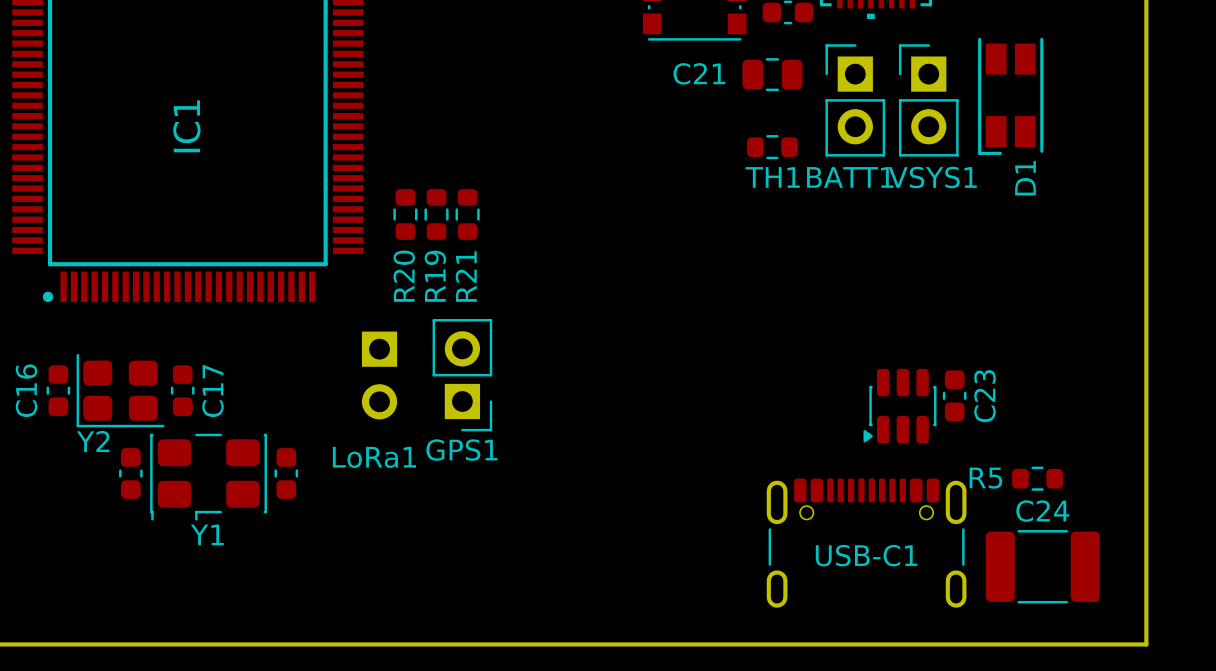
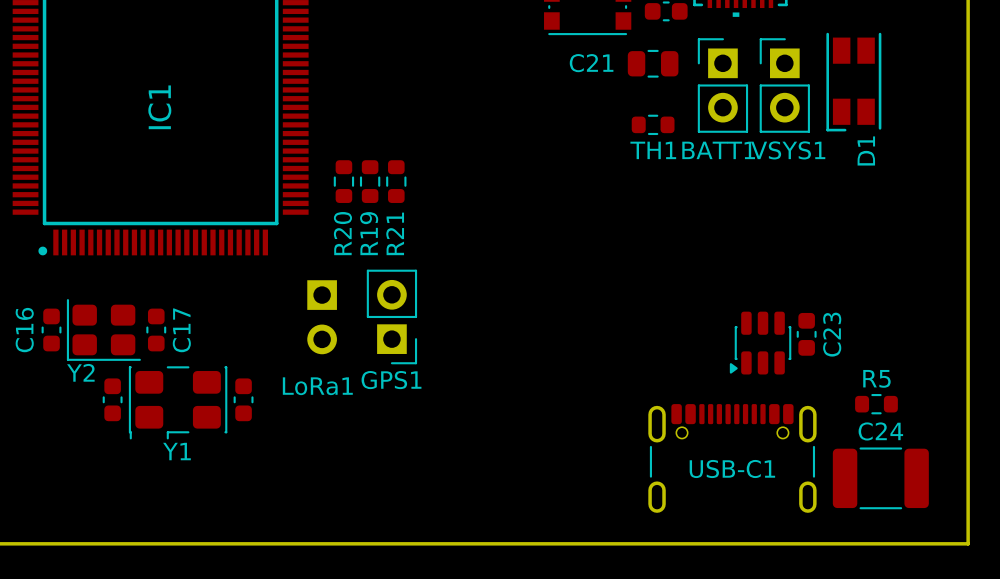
R5 name position: R5 (985, 478) -> R5 (876, 378)

